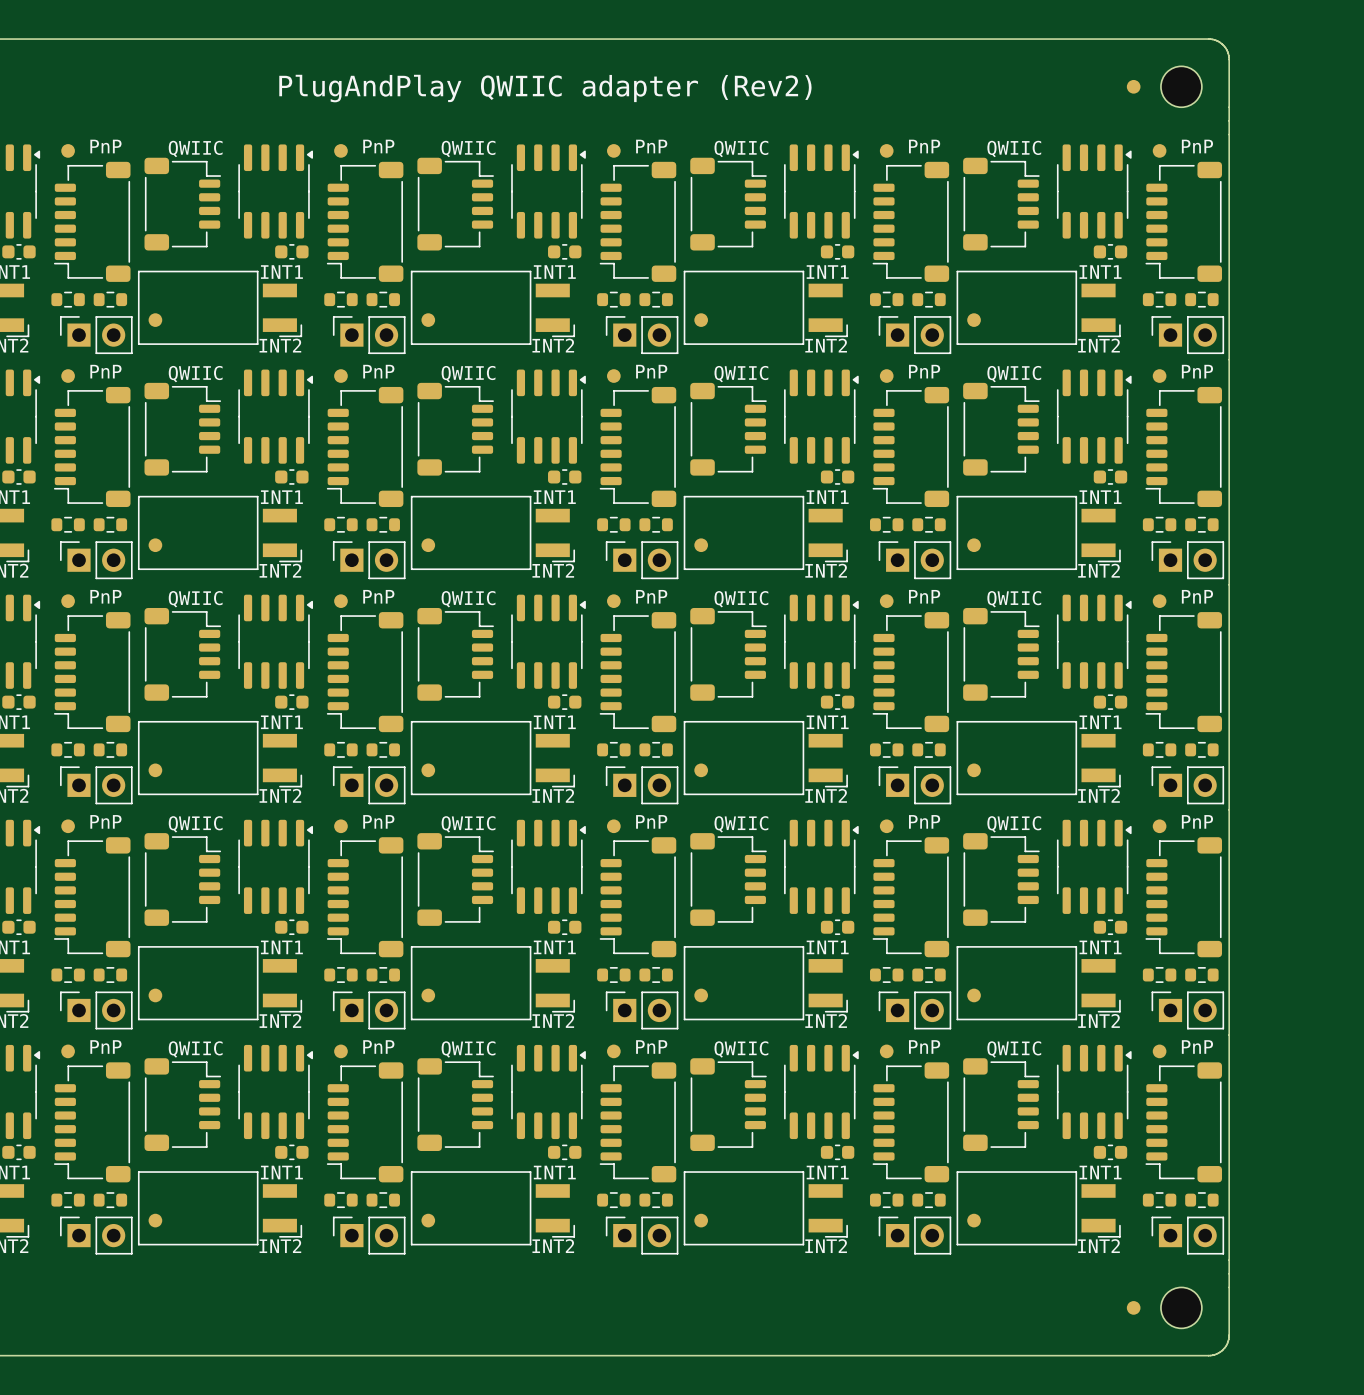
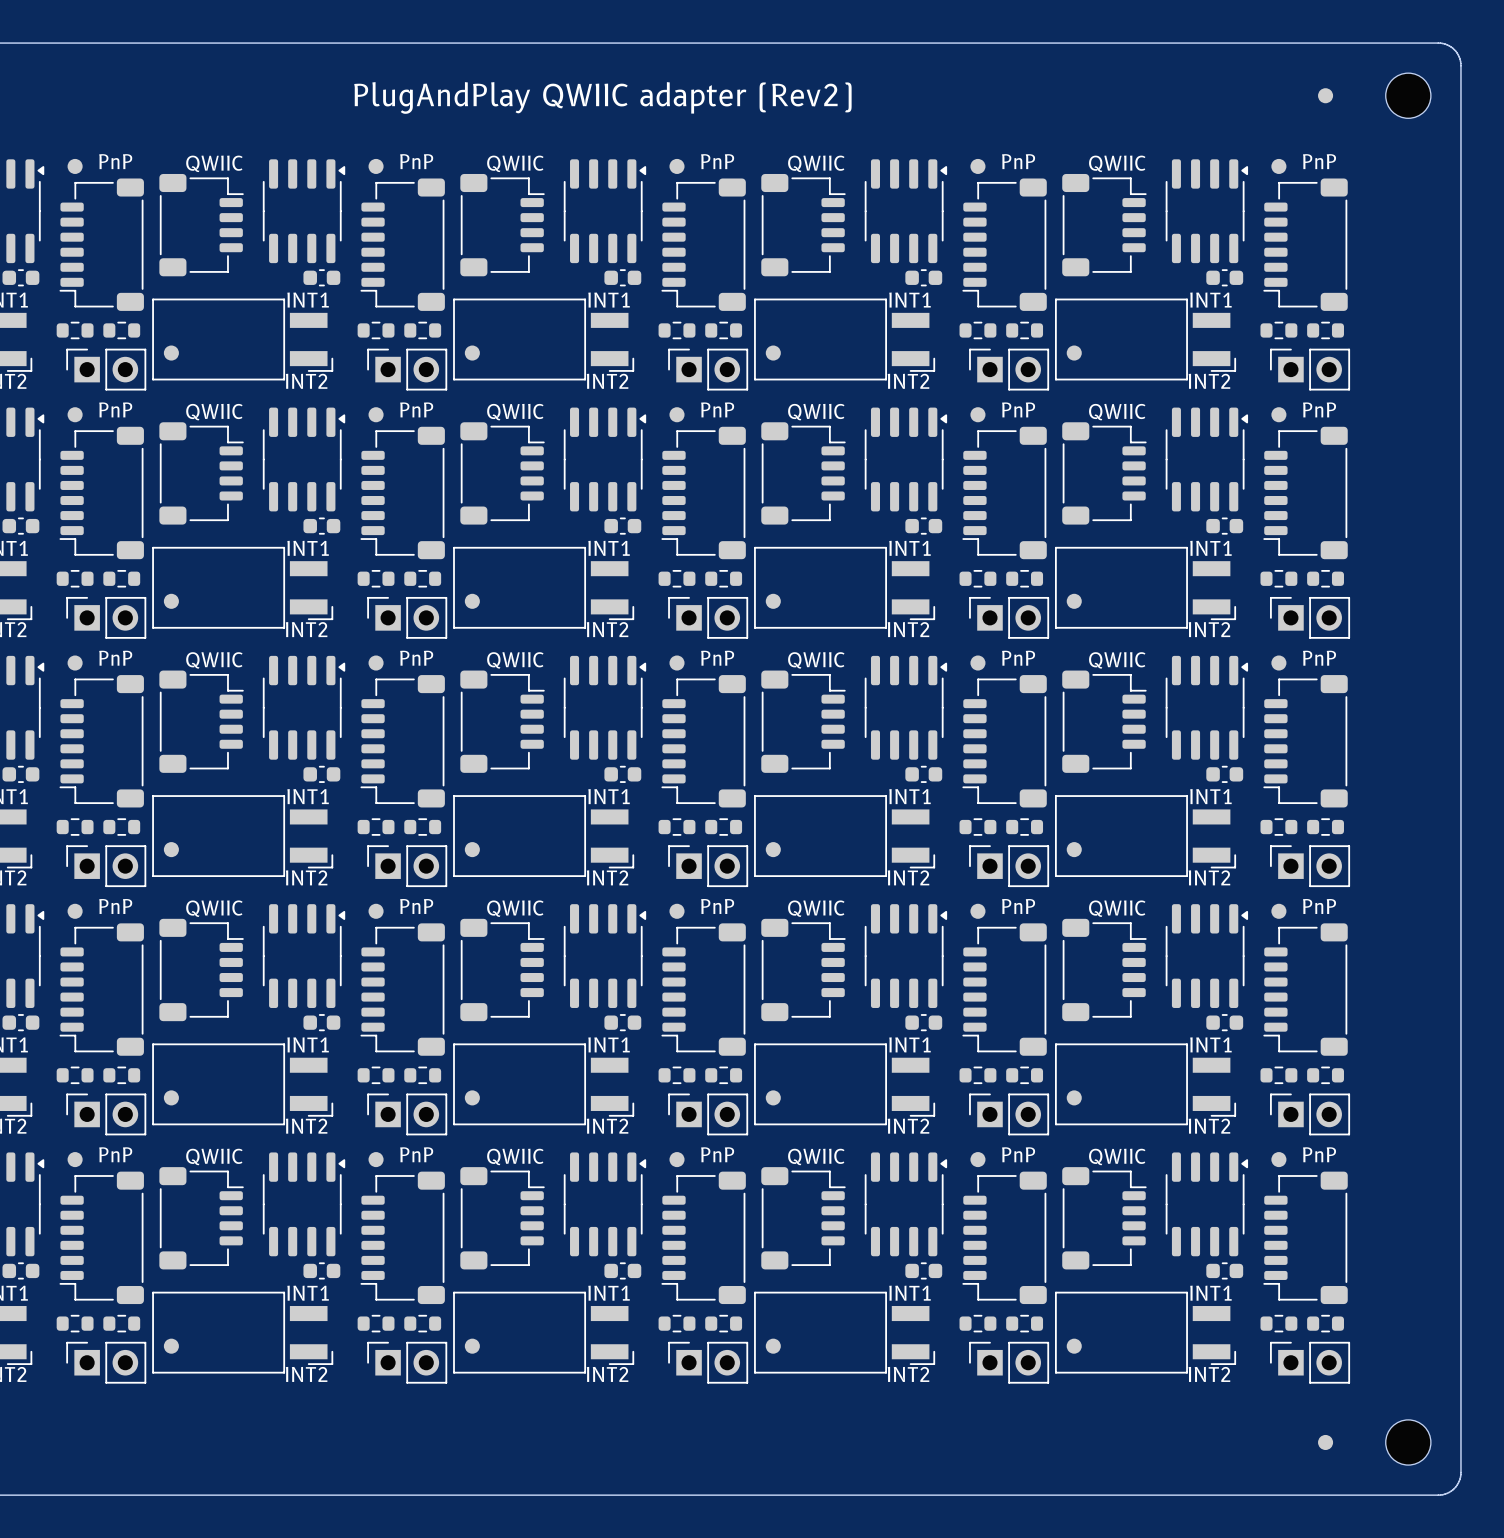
board edge: (1208, 39) (1216, 40) (1223, 45) (1227, 51) (1229, 59) (1229, 1335) (1227, 1343) (1223, 1349) (1216, 1354) (1208, 1355) -> (1333, 43) (1442, 43) (1455, 51) (1460, 65) (1460, 1474) (1454, 1488) (1442, 1494) (1333, 1495)
part position: (1133, 86) -> (1325, 95)
part position: (1181, 86) -> (1408, 95)
part position: (1133, 1307) -> (1325, 1442)
part position: (1181, 1307) -> (1408, 1442)

